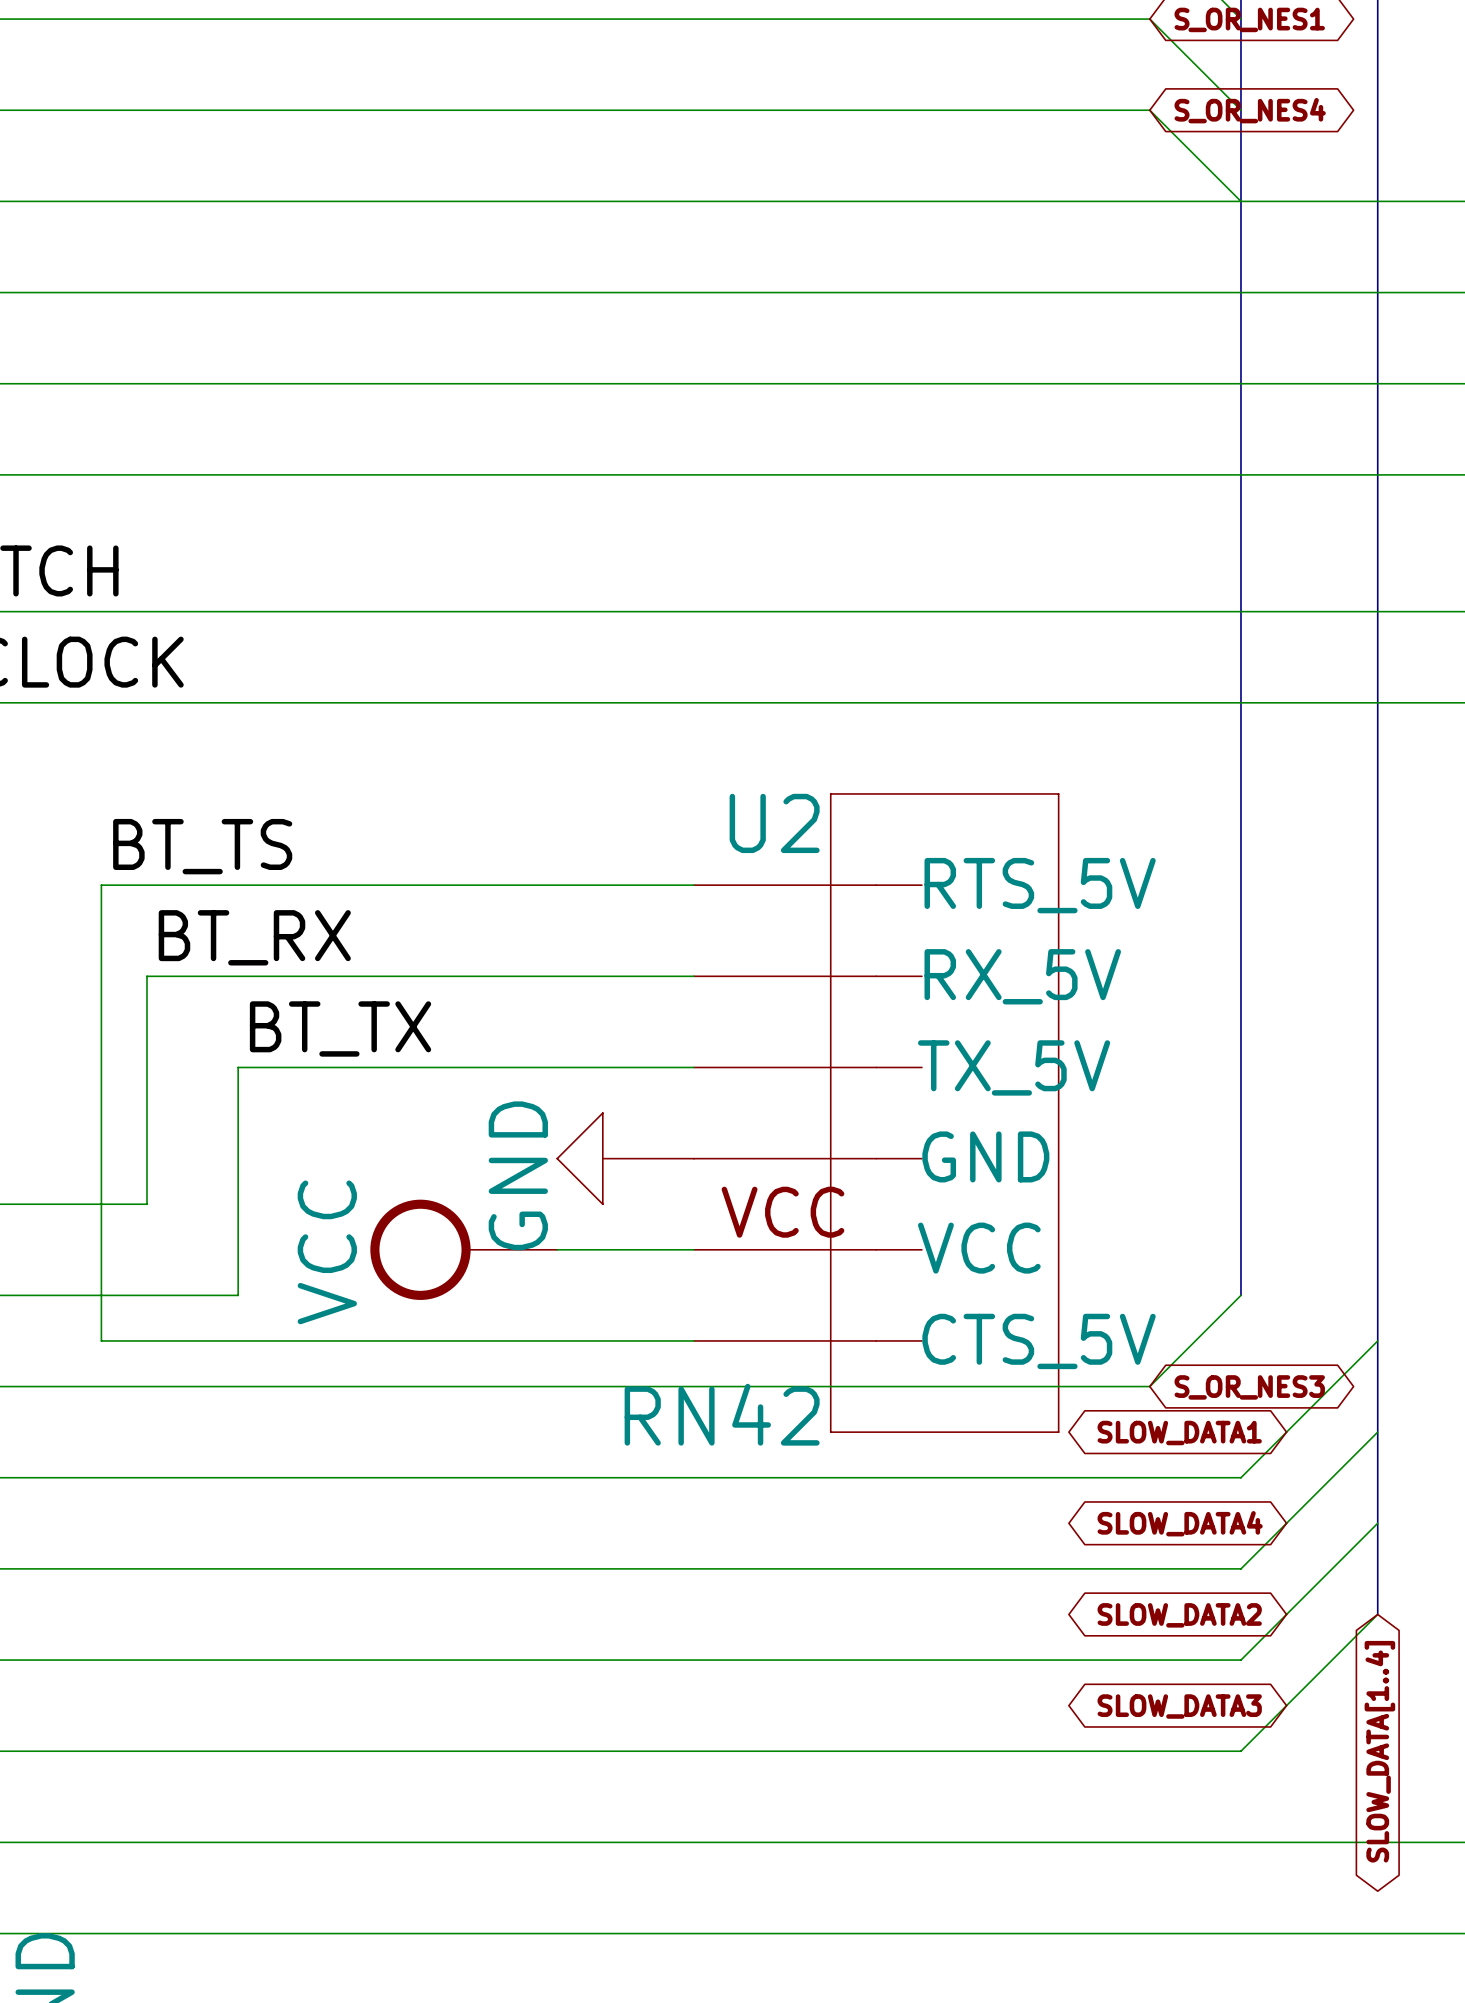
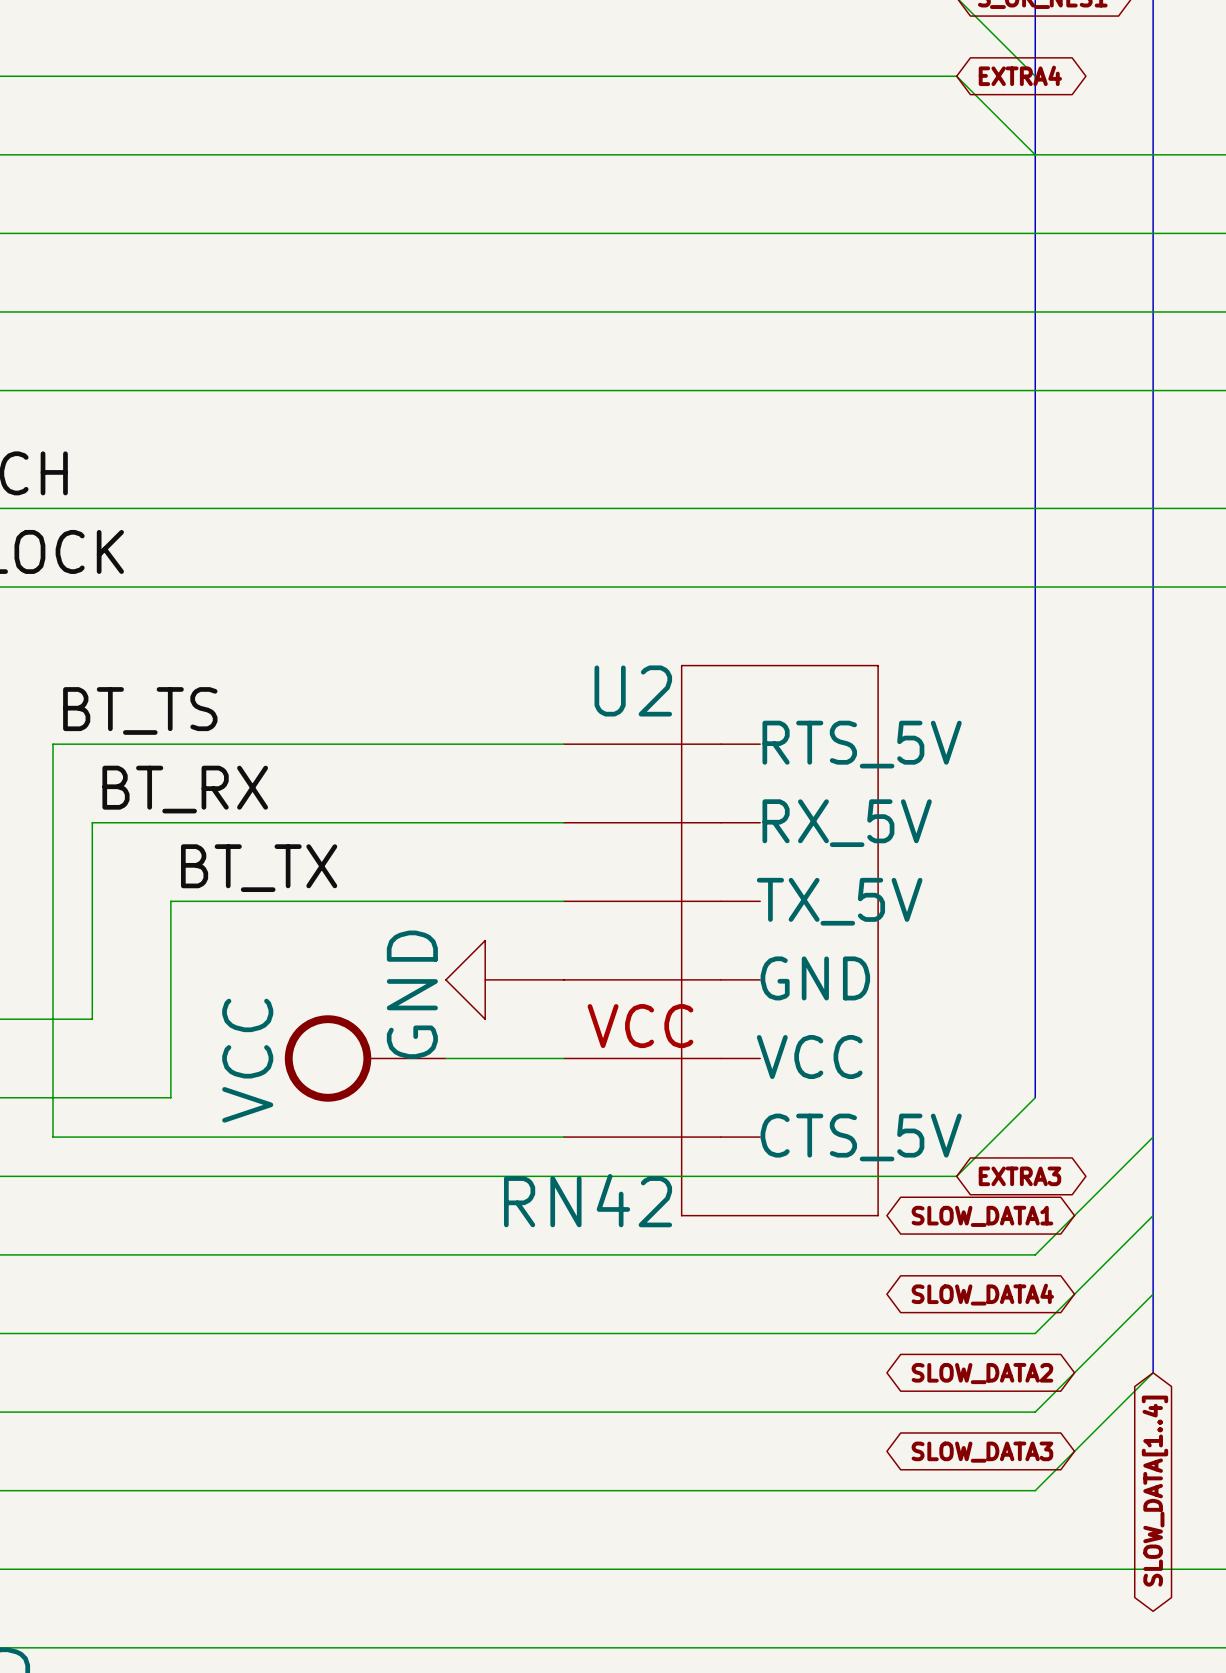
global label: S_OR_NES4 (1250, 110) -> EXTRA4 (1020, 75)
global label: S_OR_NES3 (1249, 1387) -> EXTRA3 (1019, 1176)

